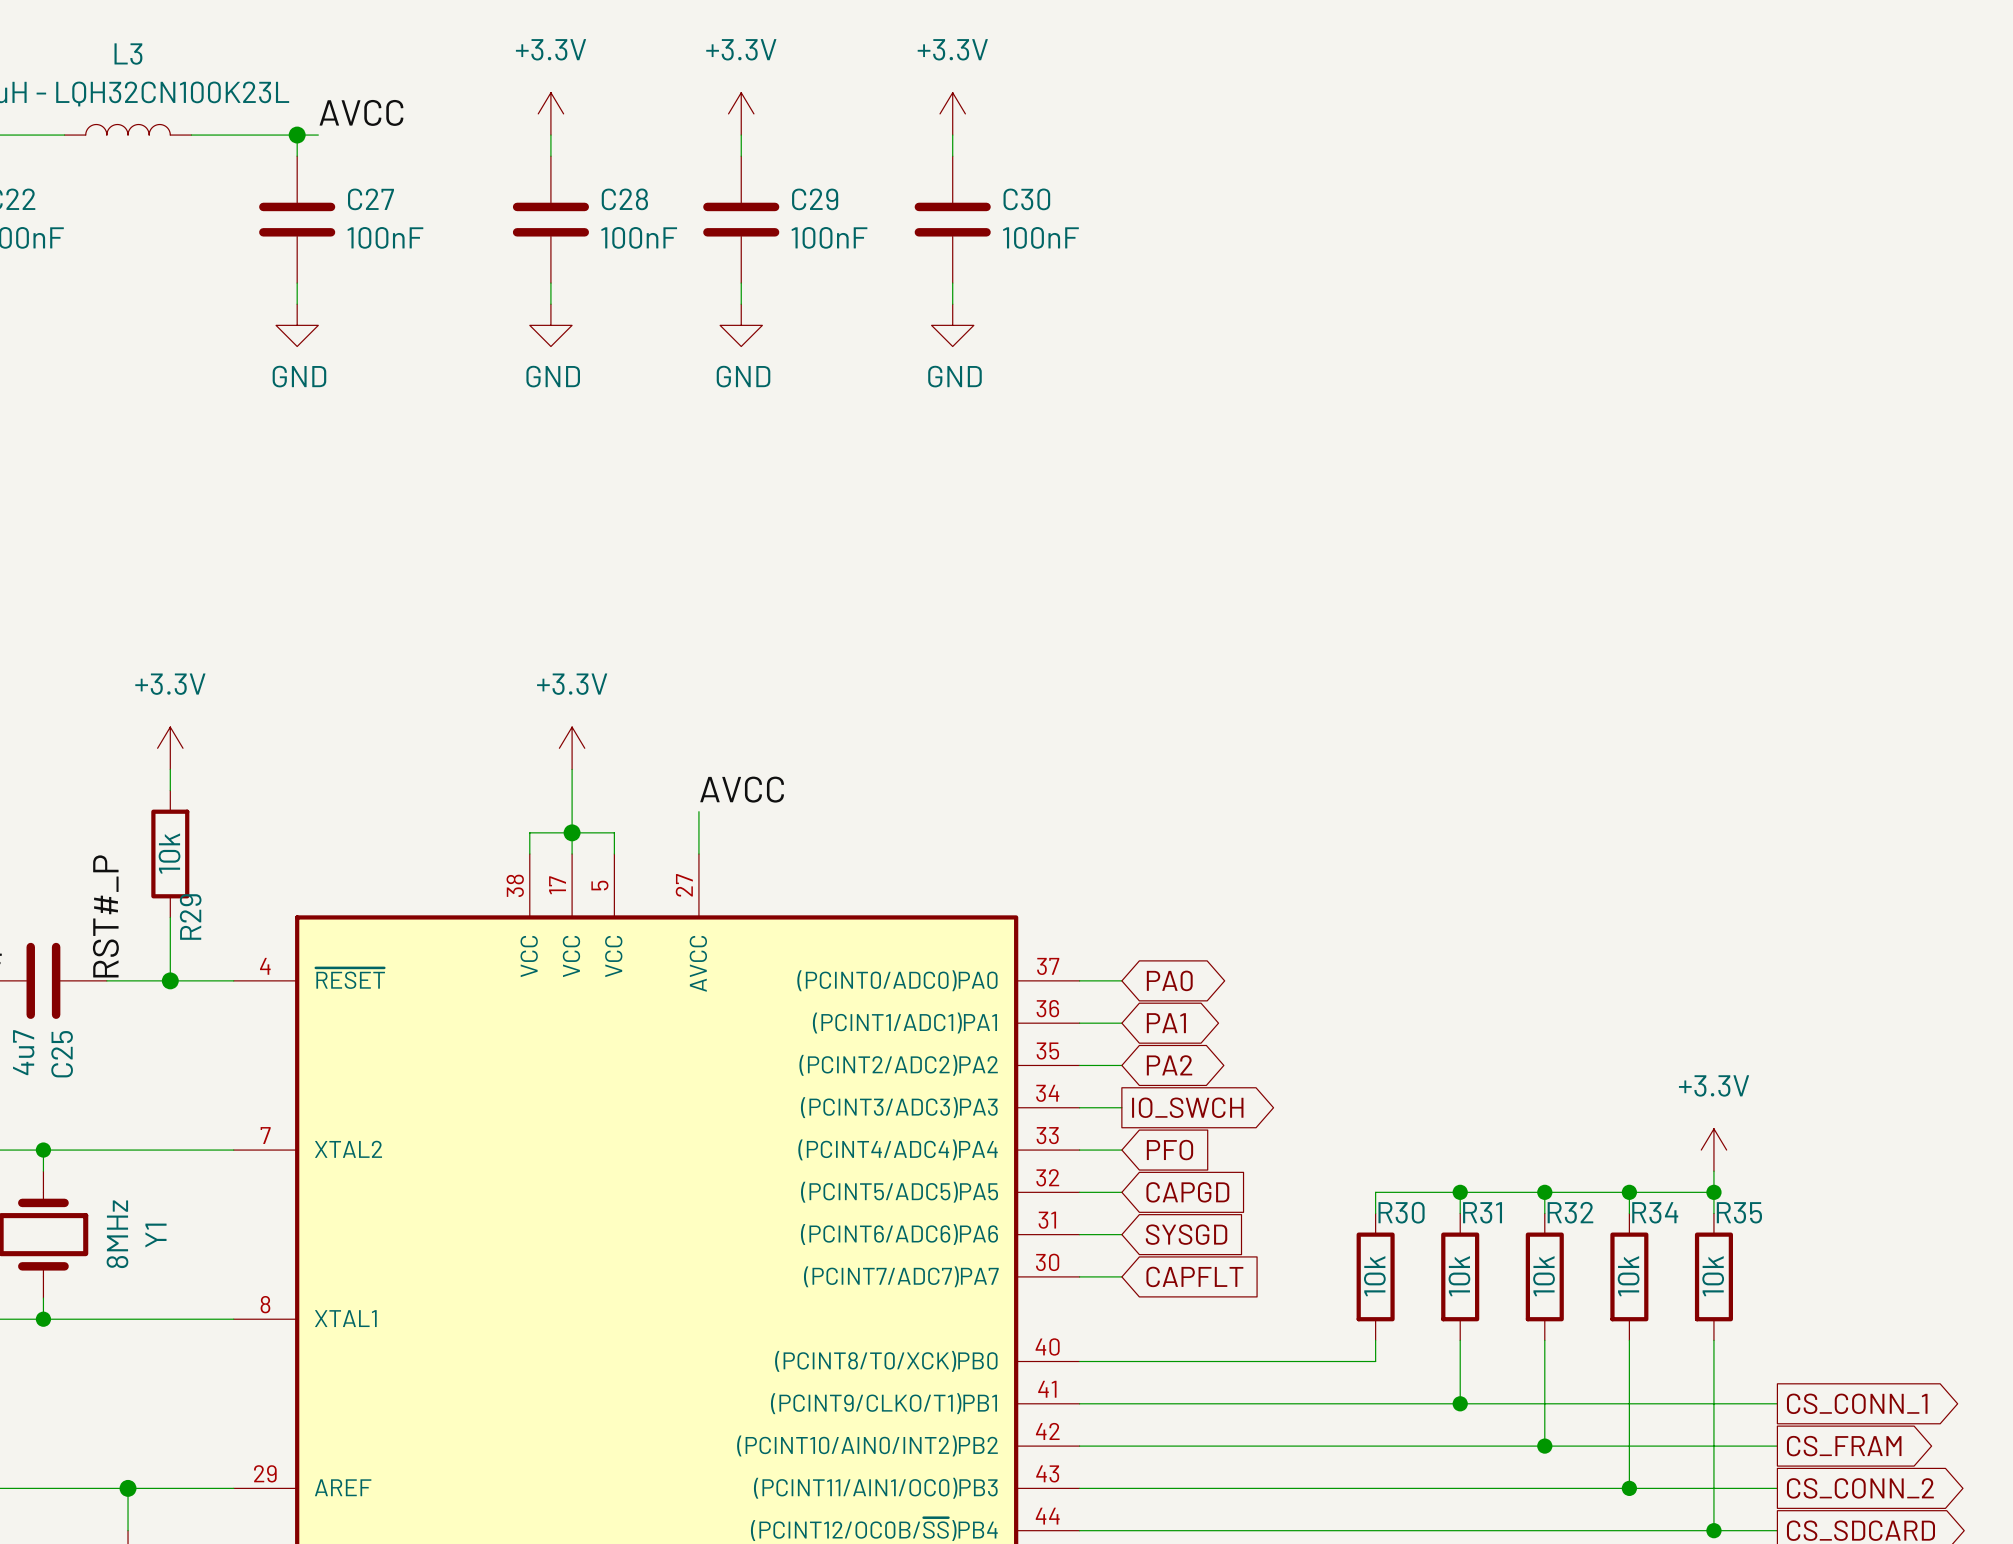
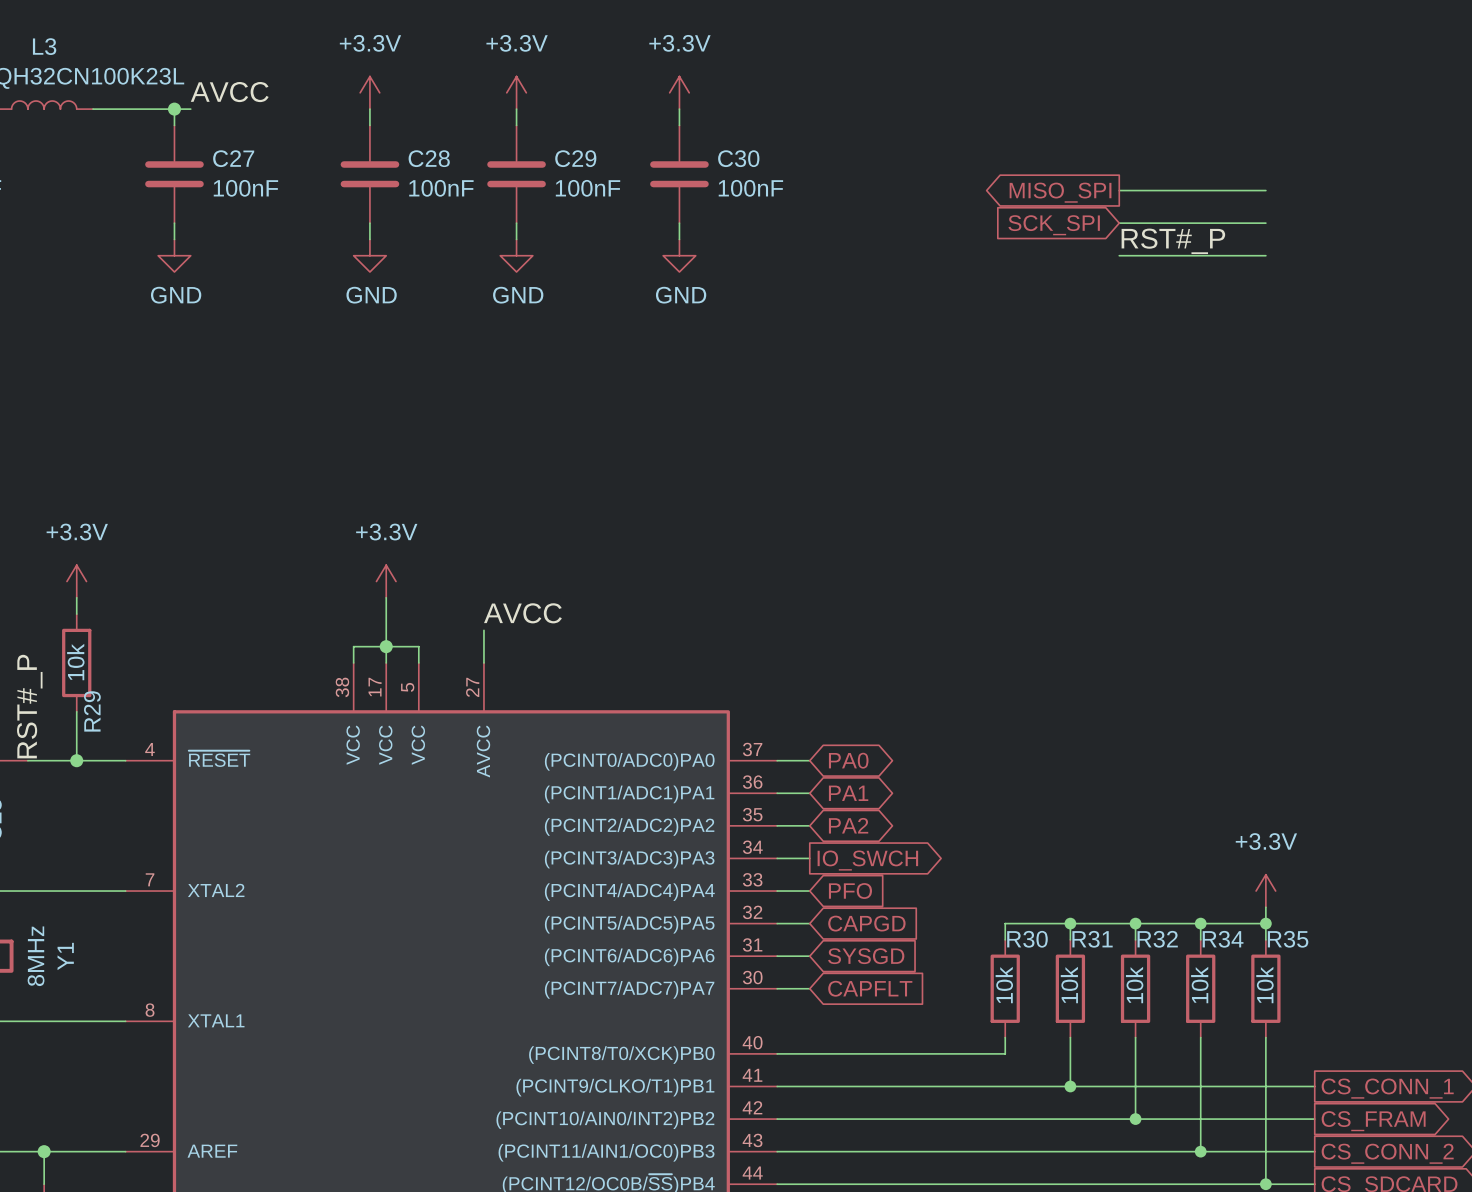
global label: none -> MISO_SPI (1060, 192)
wire: none -> (1119, 190) (1265, 190)
global label: none -> SCK_SPI (1054, 225)
wire: none -> (1119, 223) (1265, 223)
label: none -> RST#_P (1173, 241)
wire: none -> (1119, 255) (1265, 255)

